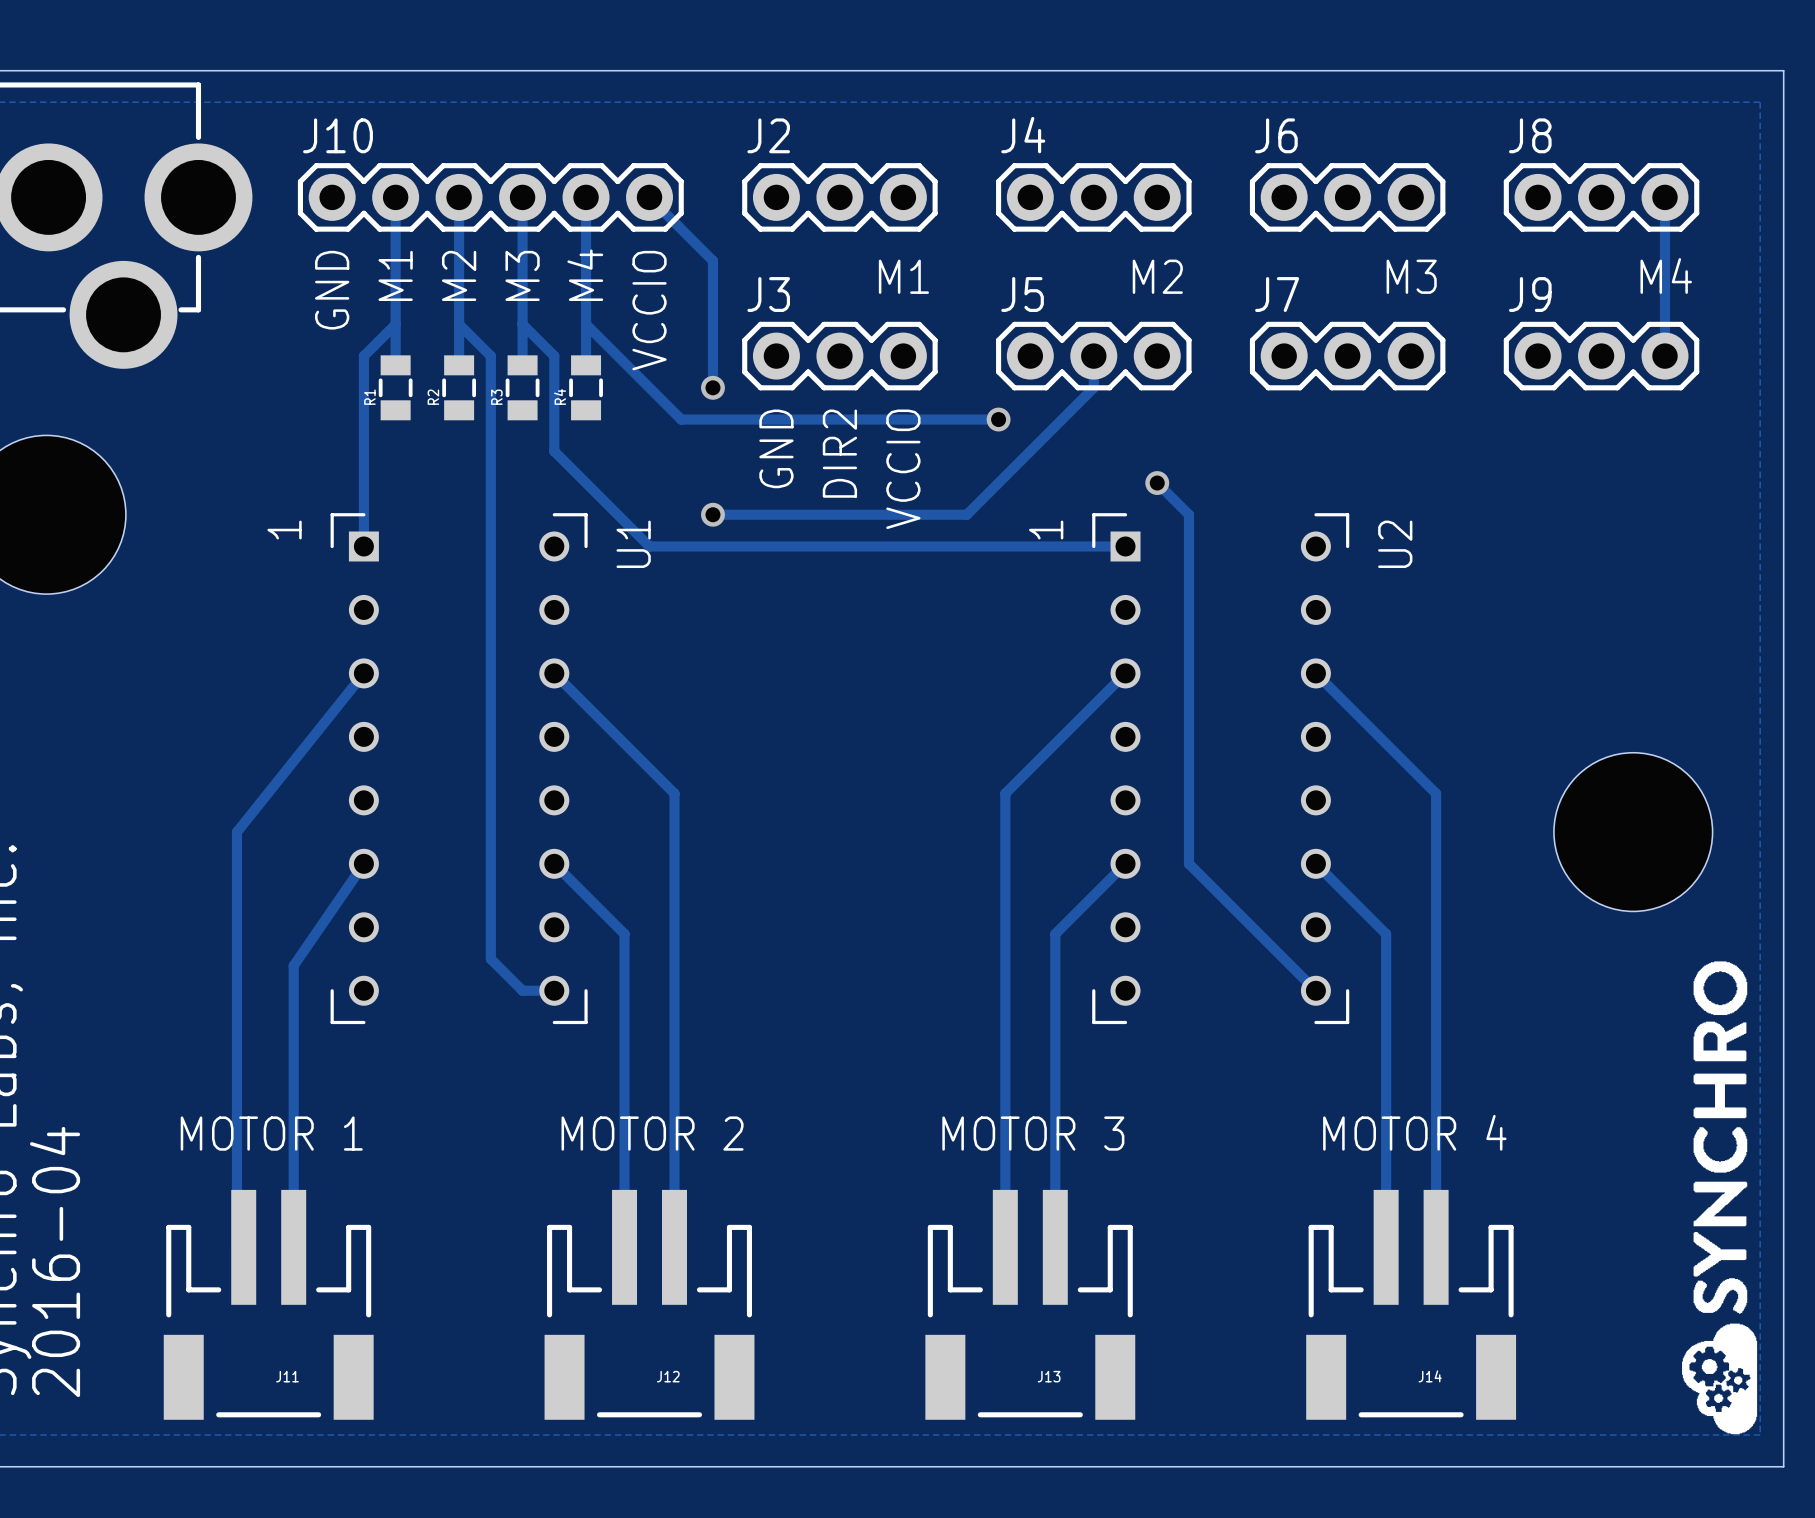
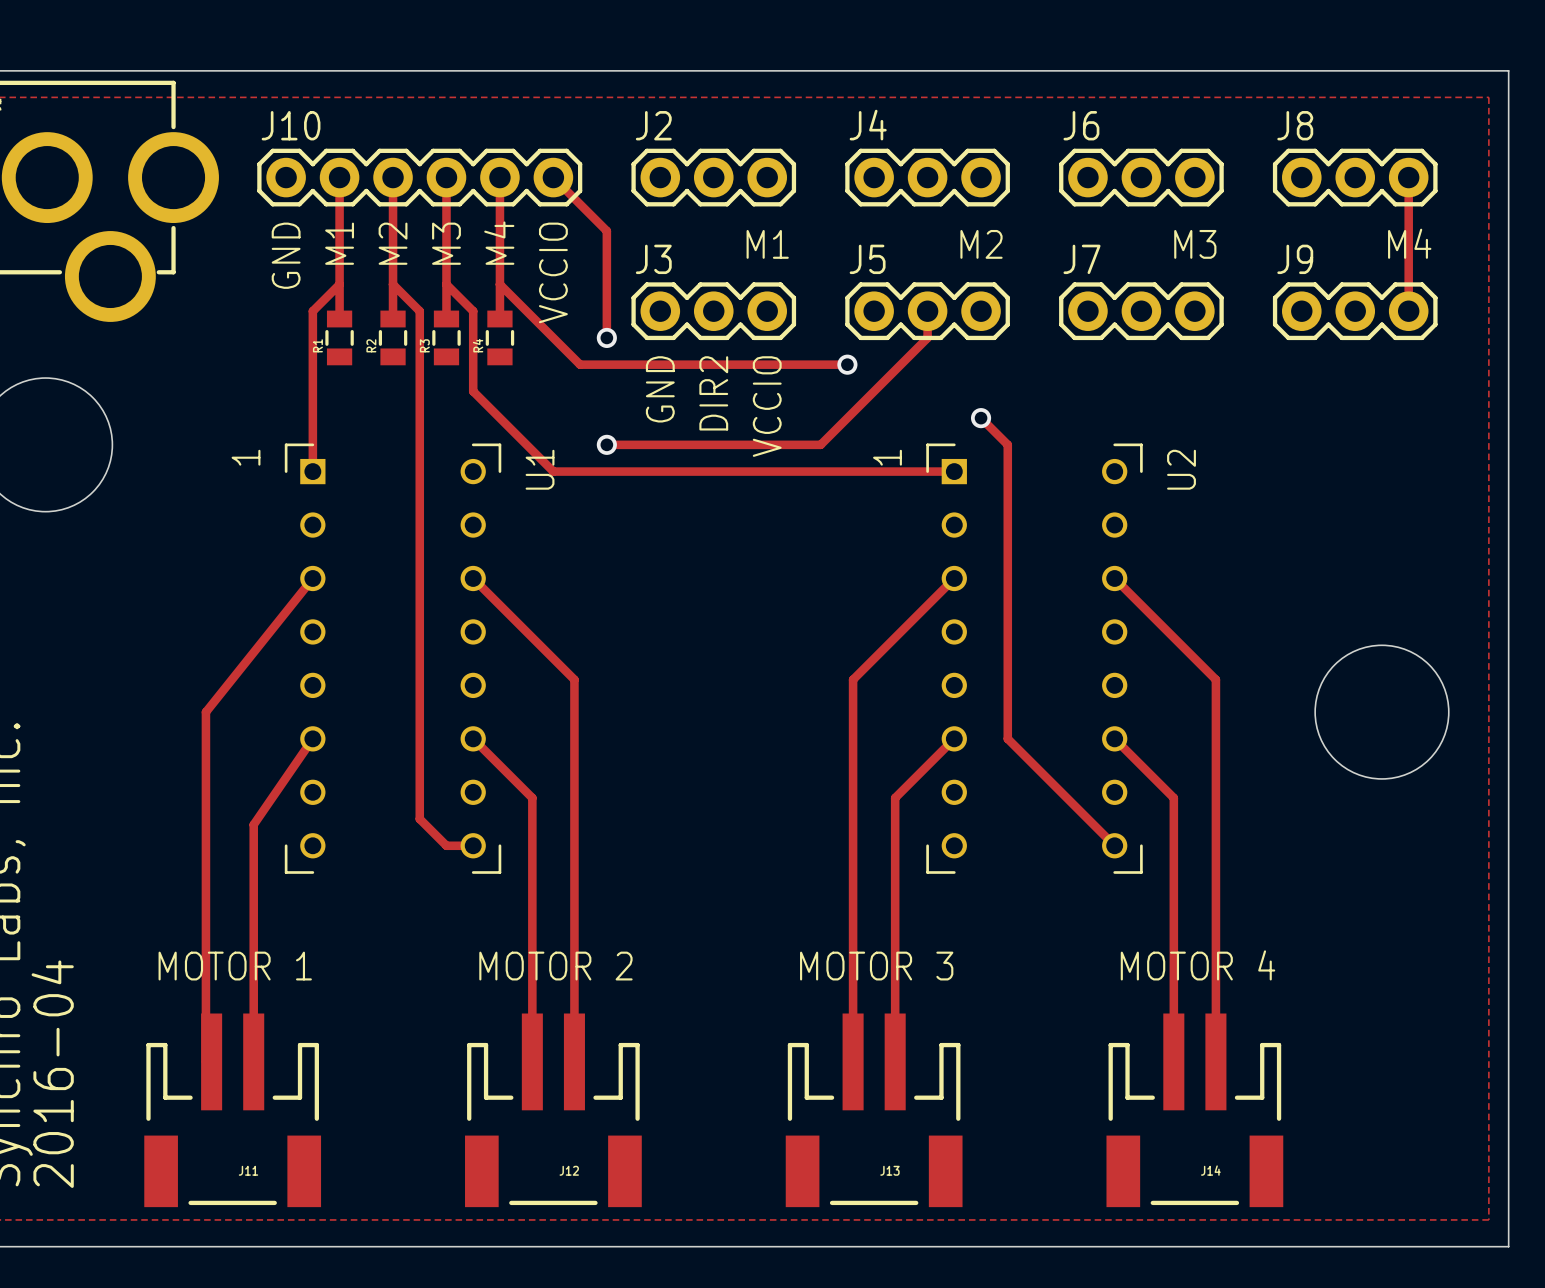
drawing: [1682, 961, 1758, 1435] -> none

